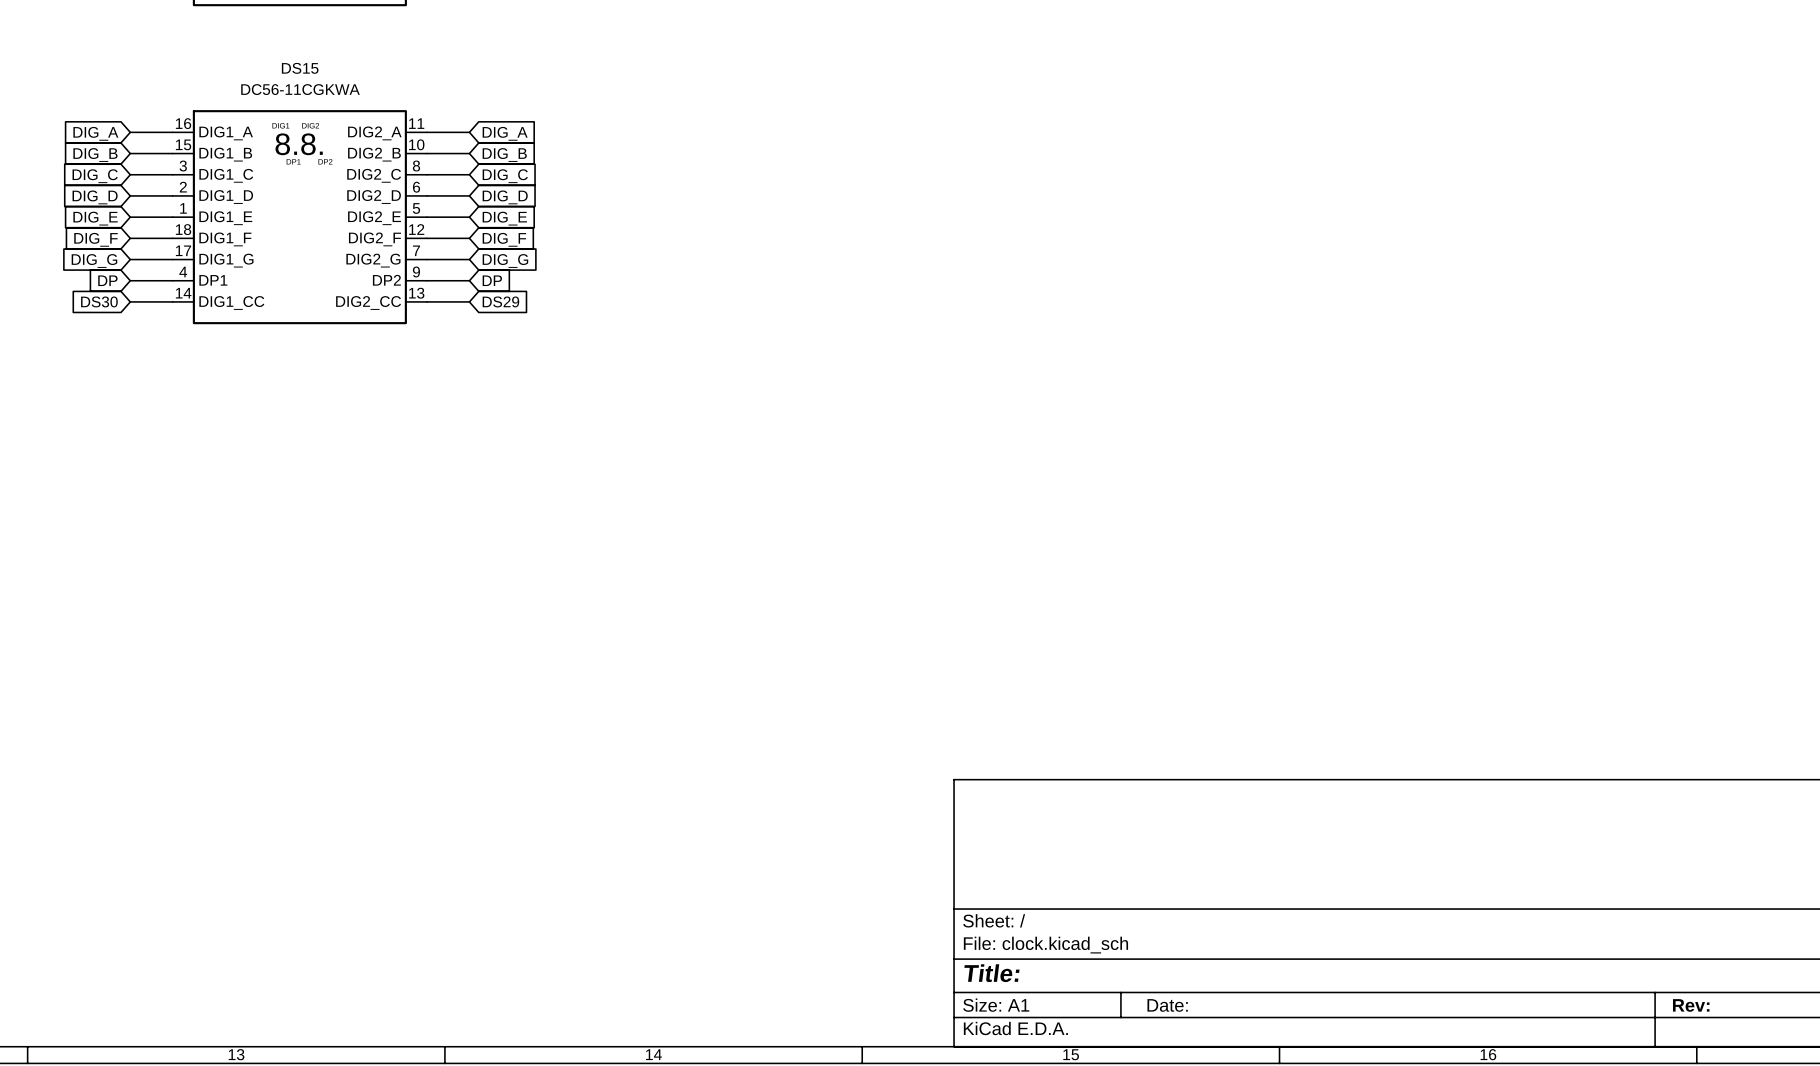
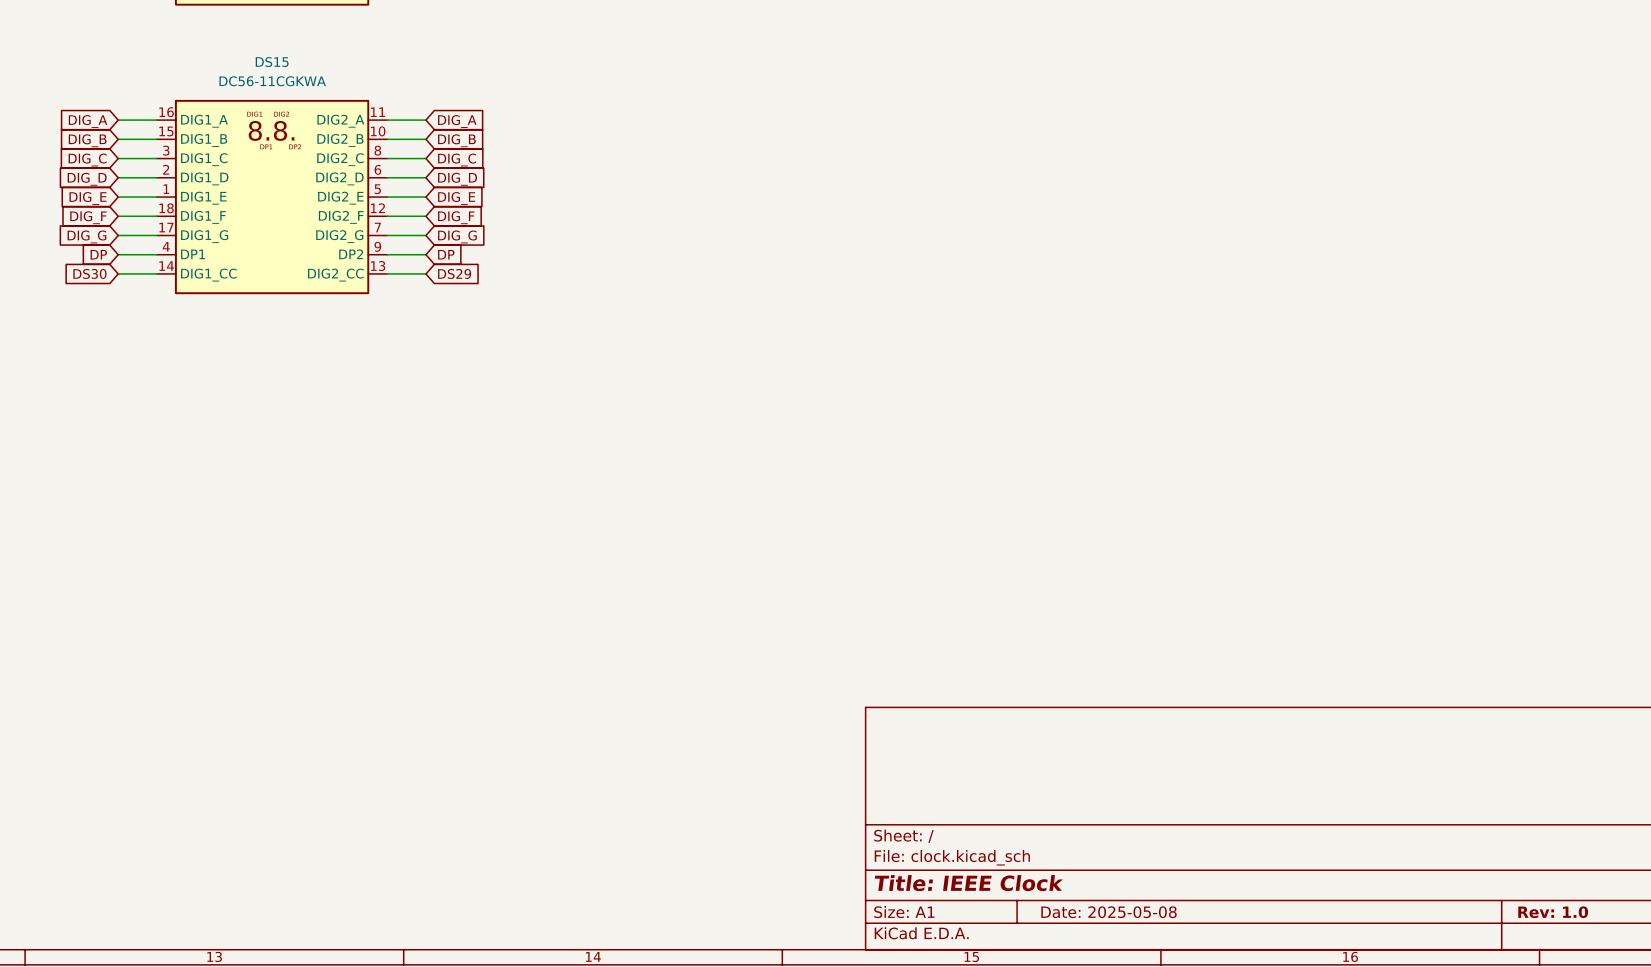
title block: Title: (991, 973) -> Title: IEEE Clock (968, 883)
title block: Date: (1167, 1005) -> Date: 2025-05-08 (1109, 912)
title block: Rev: (1691, 1005) -> Rev: 1.0 (1553, 912)

